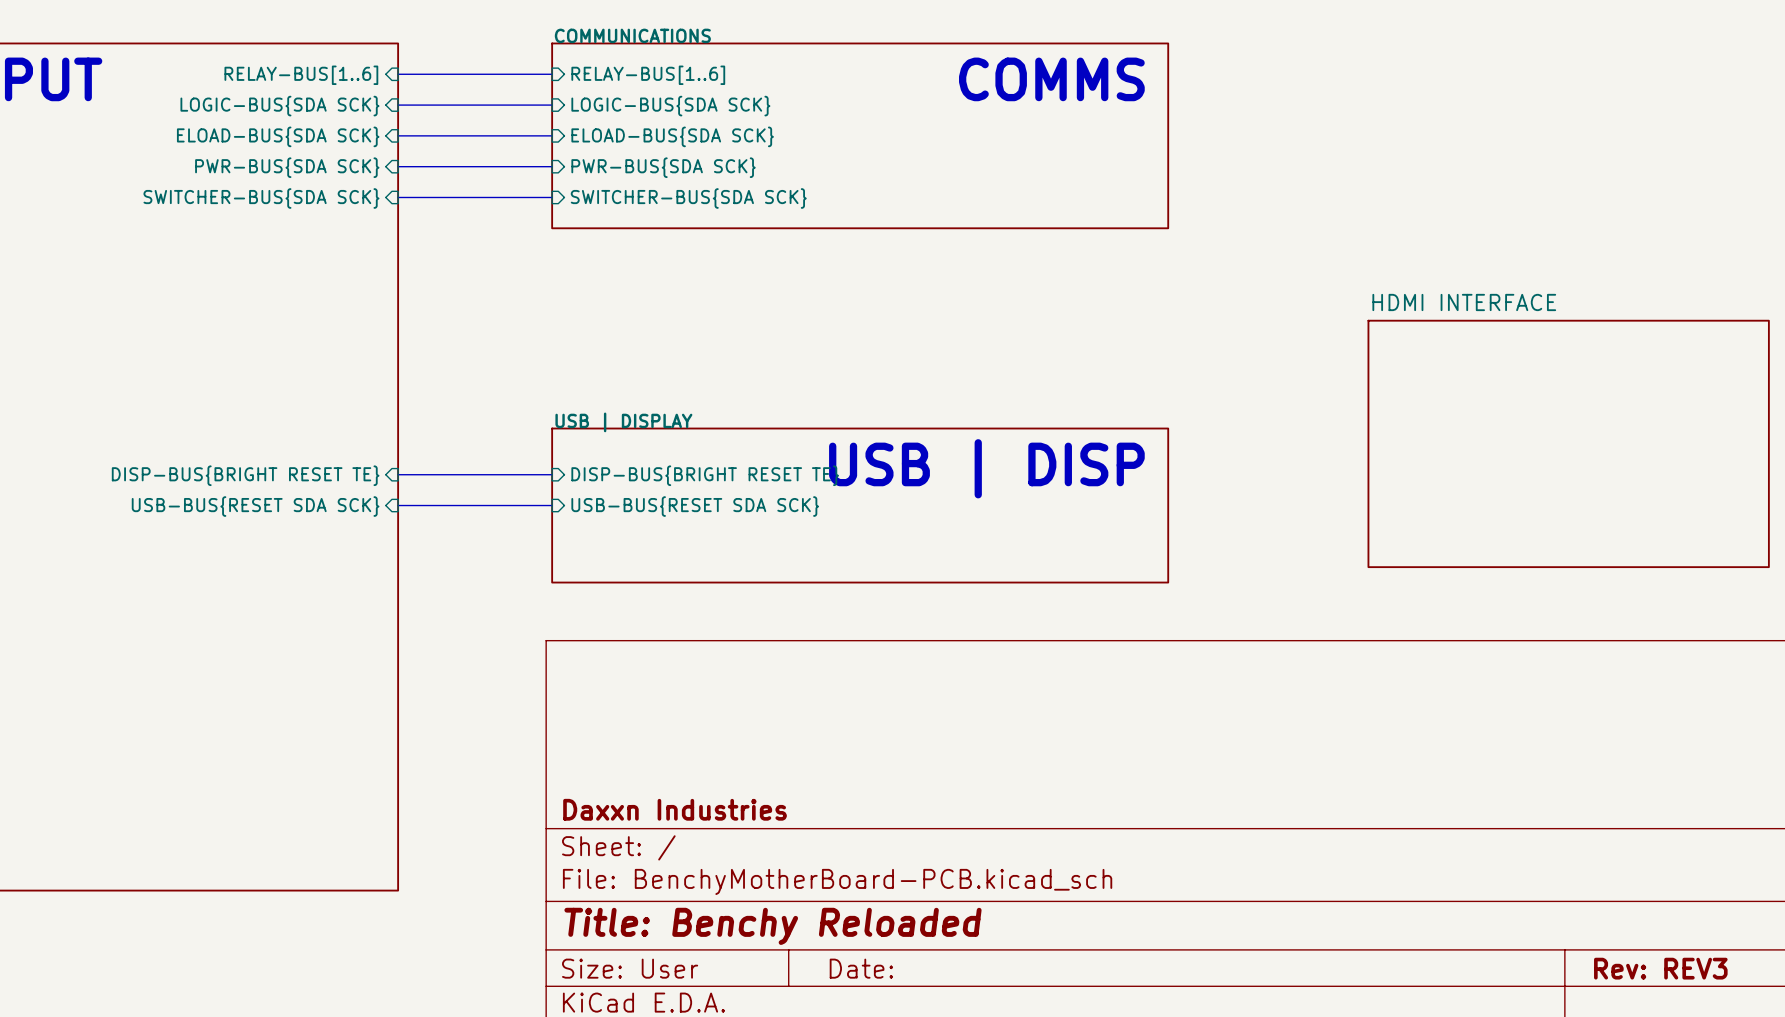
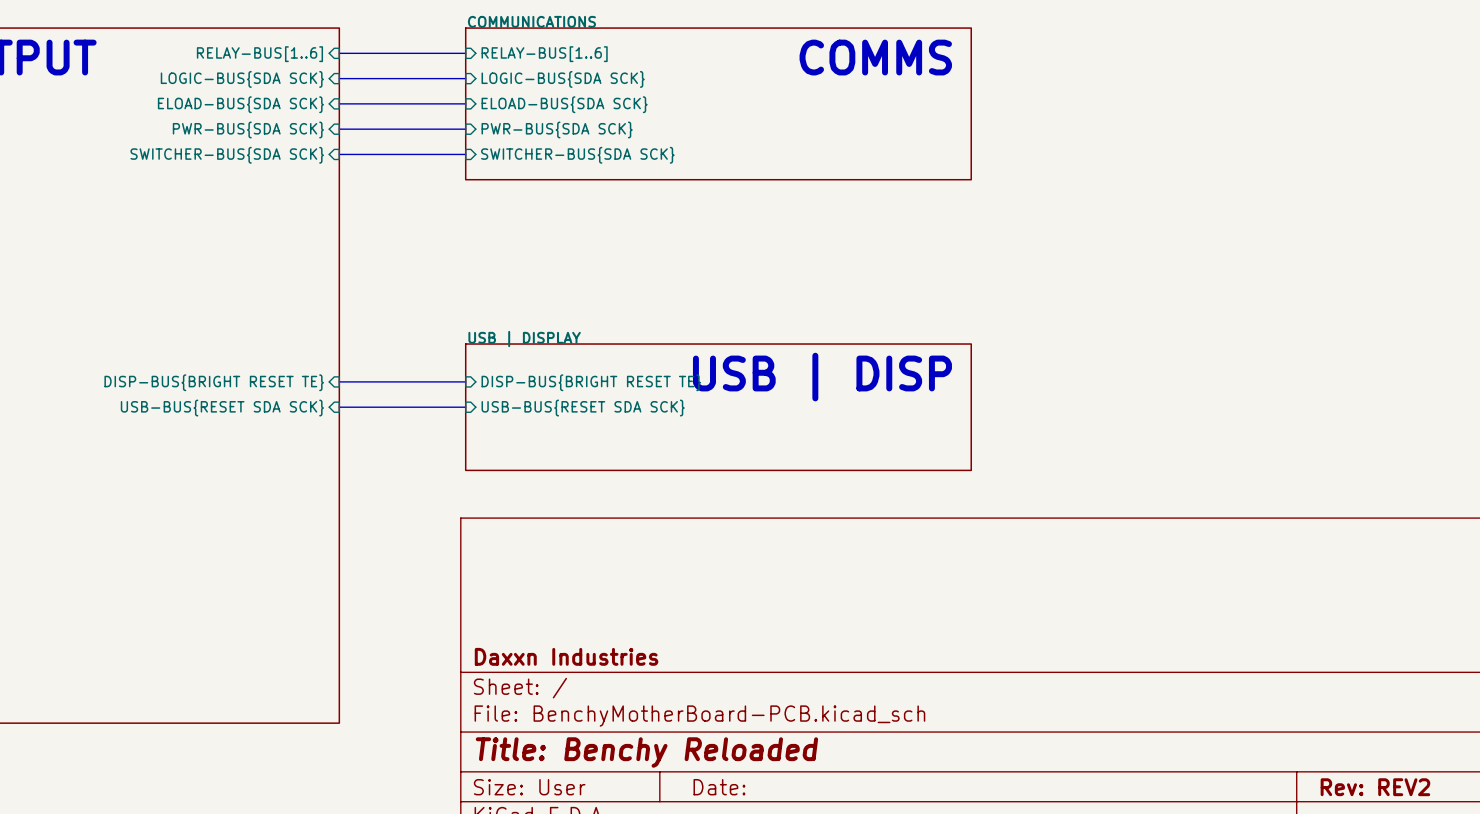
sheet HDMI INTERFACE: (1568, 443) -> none
title block: Rev: REV3 (1660, 968) -> Rev: REV2 (1375, 787)

